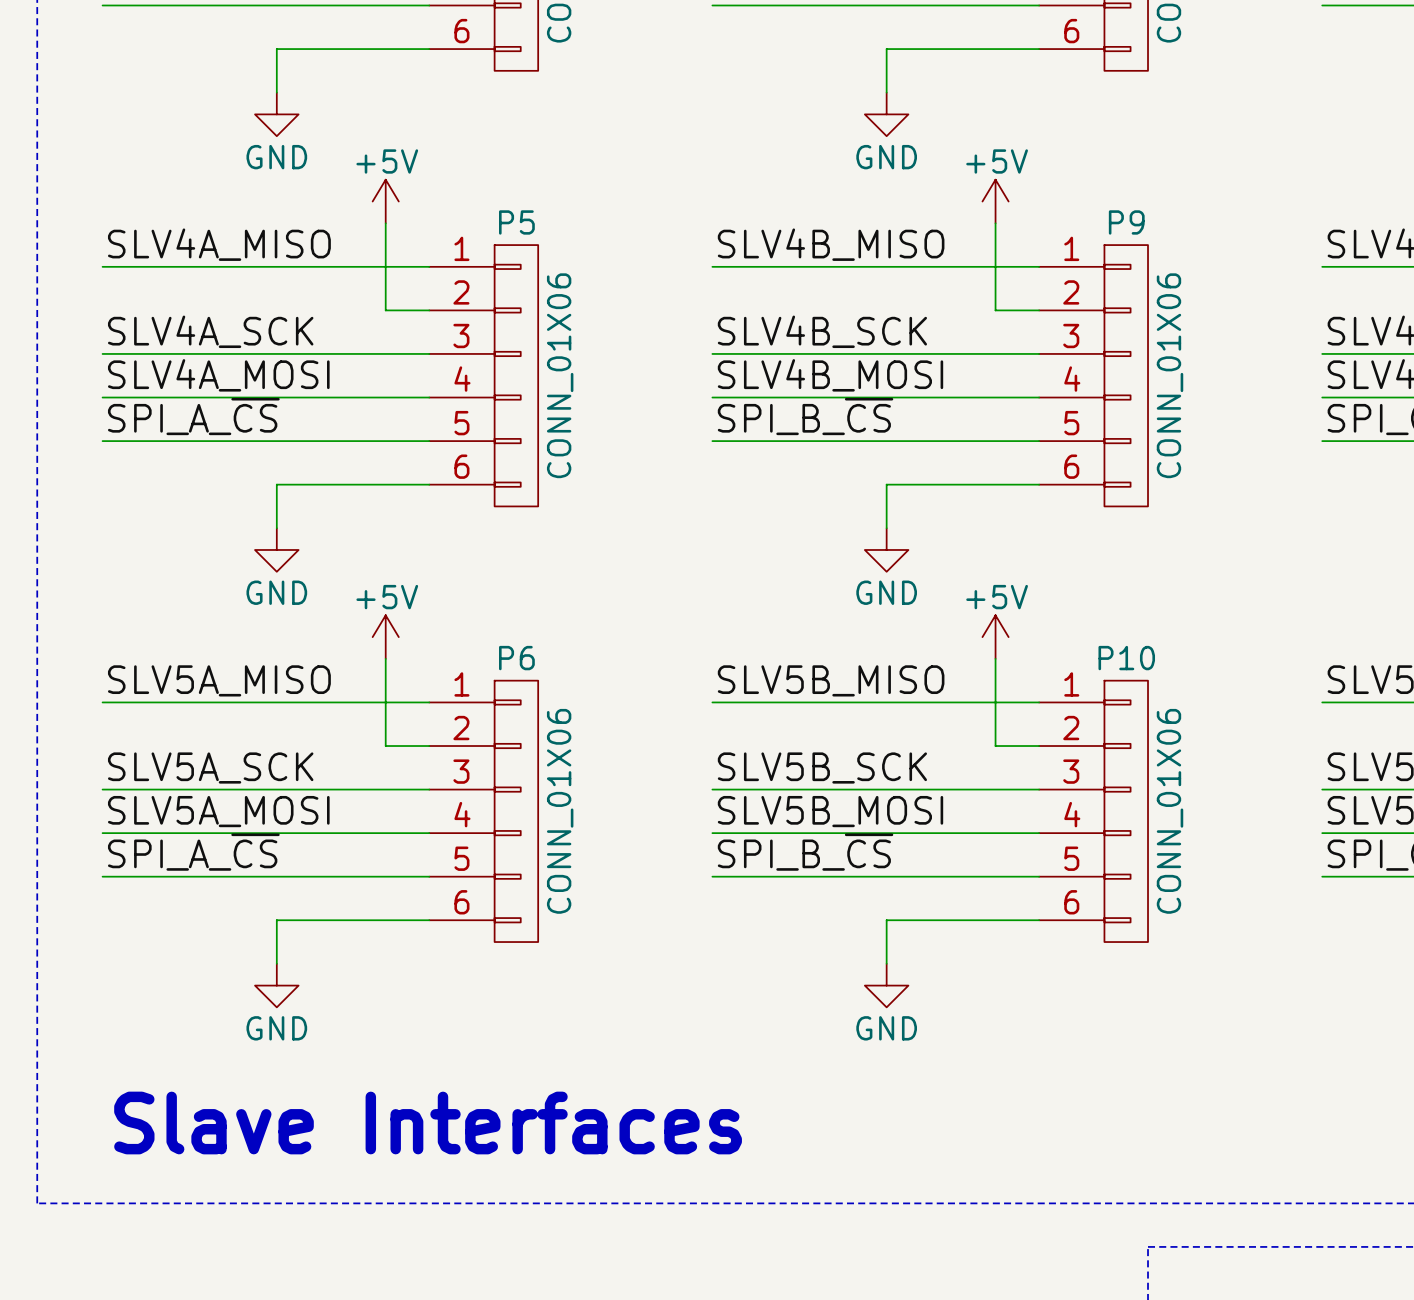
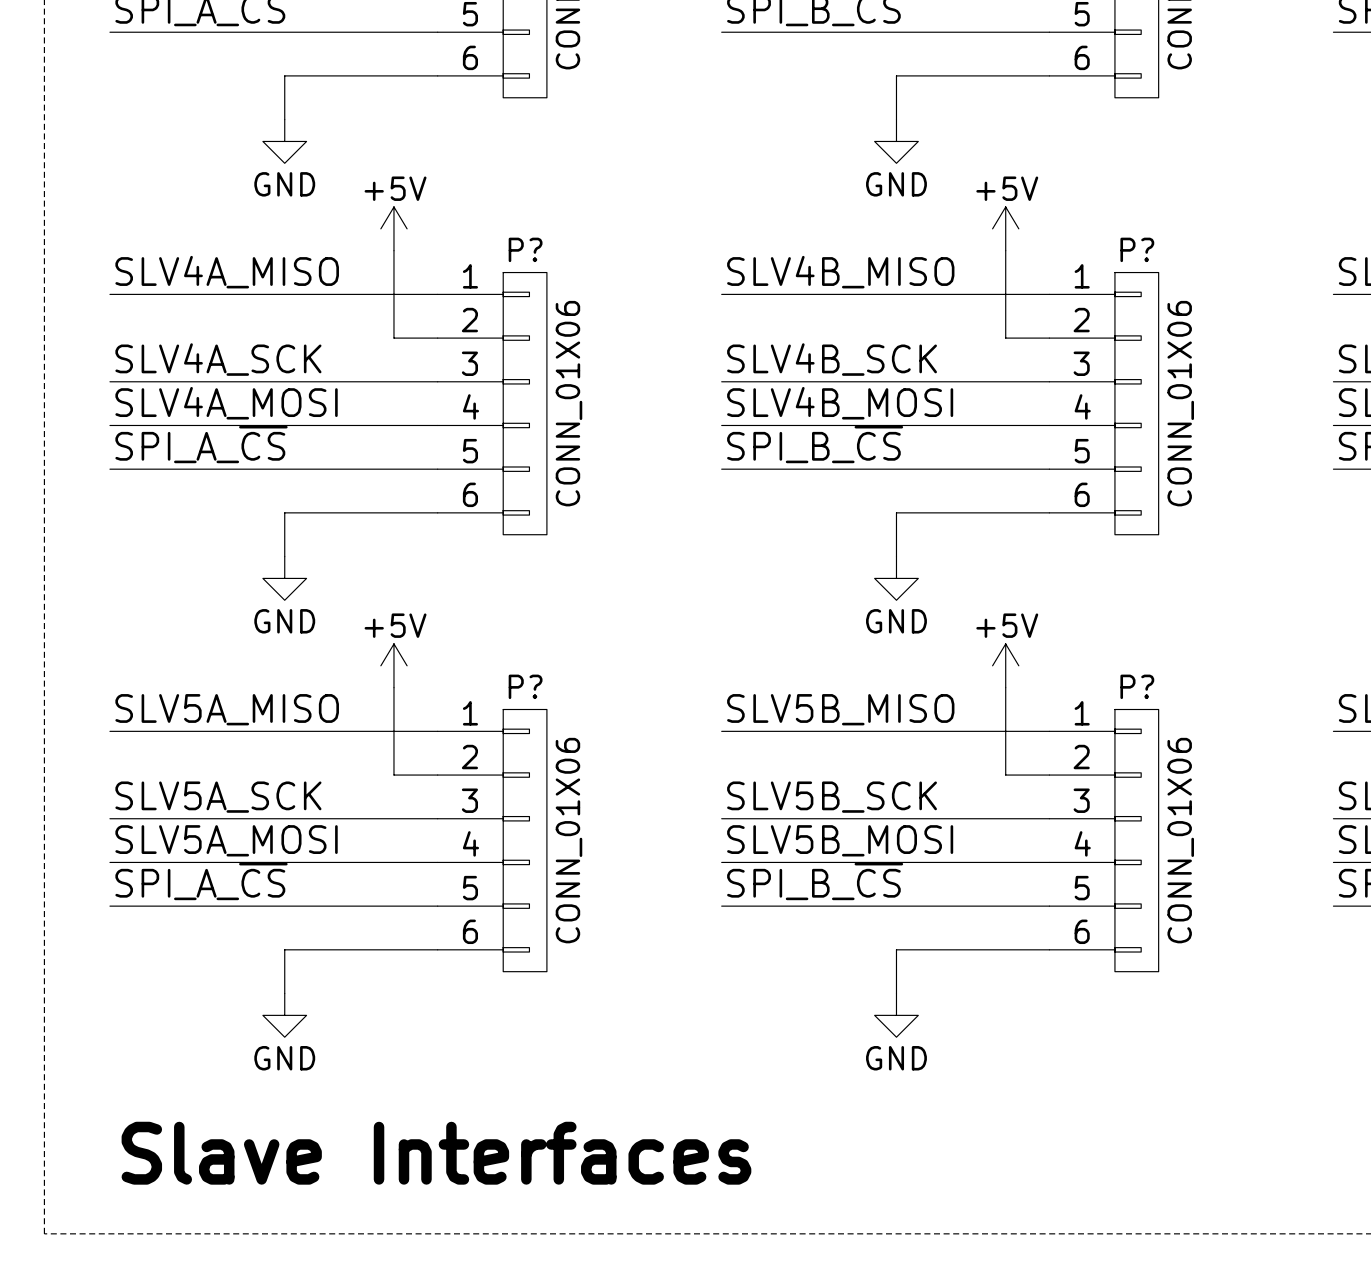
P5 name: P5 (516, 222) -> P? (525, 249)
P9 name: P9 (1126, 222) -> P? (1137, 249)
P6 name: P6 (516, 658) -> P? (525, 686)
P10 name: P10 (1126, 658) -> P? (1137, 686)

